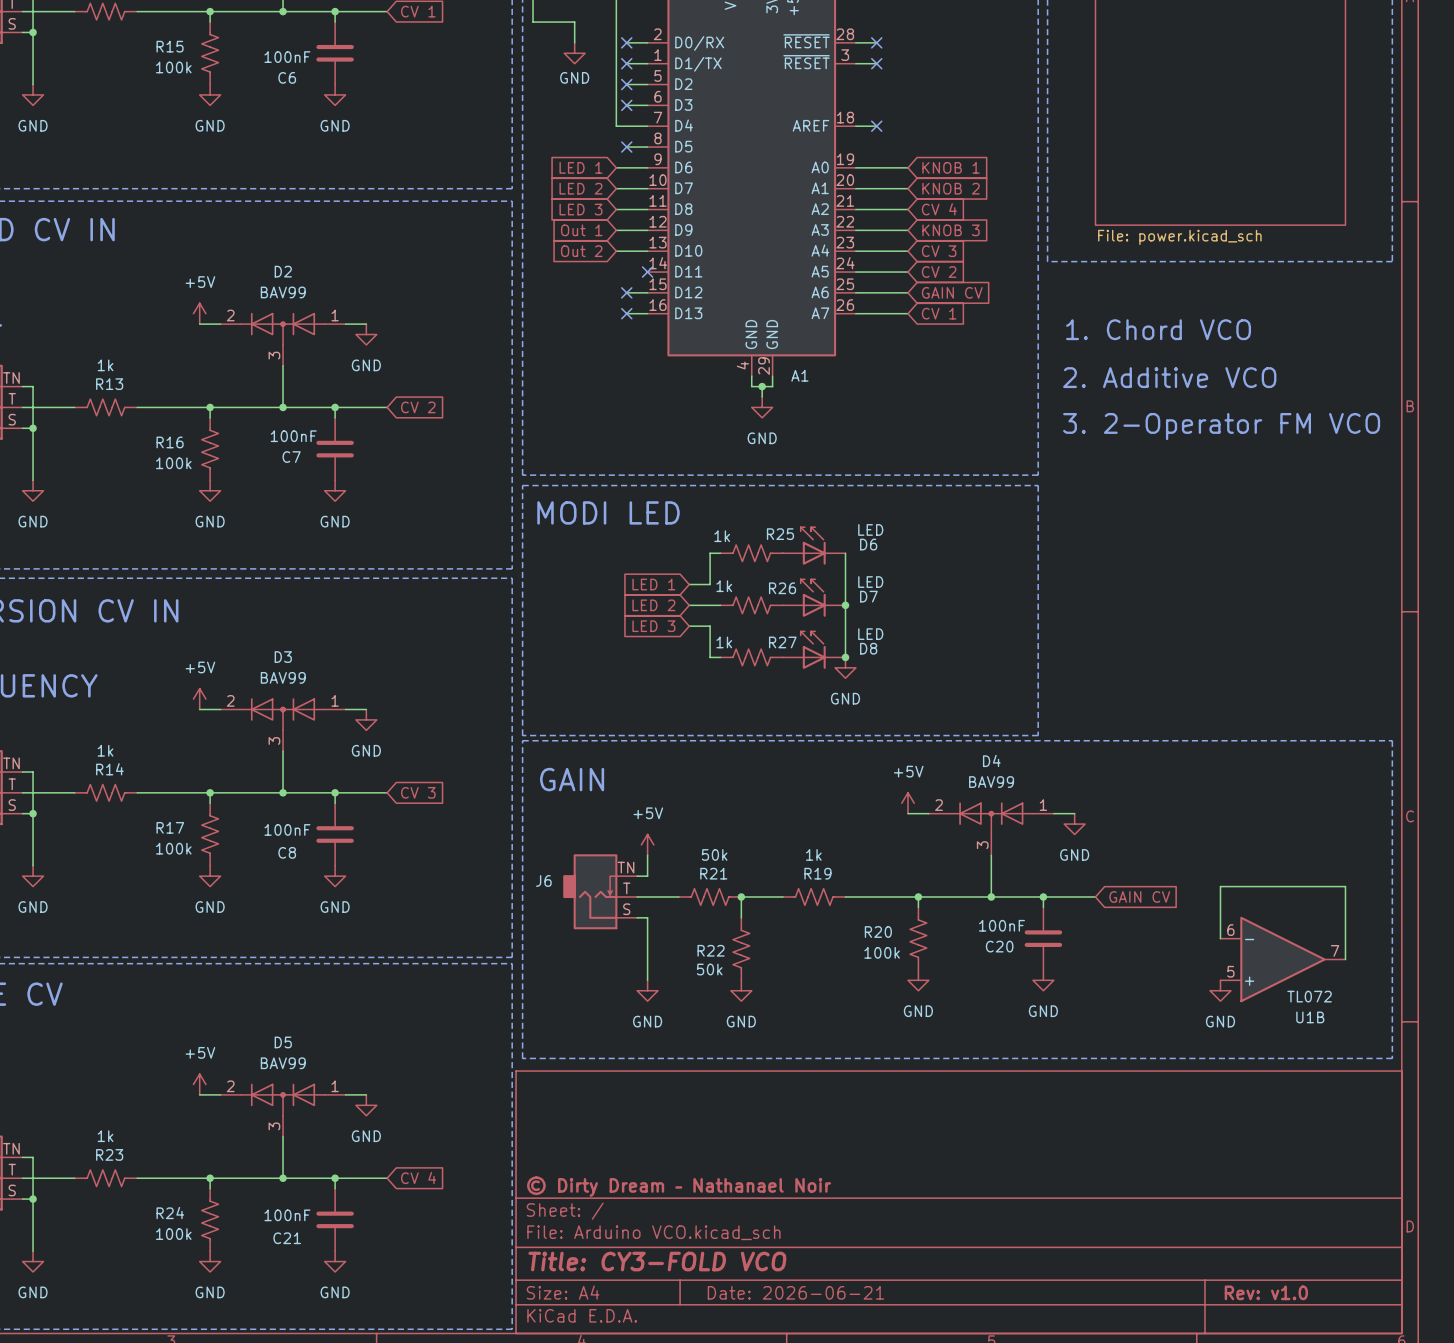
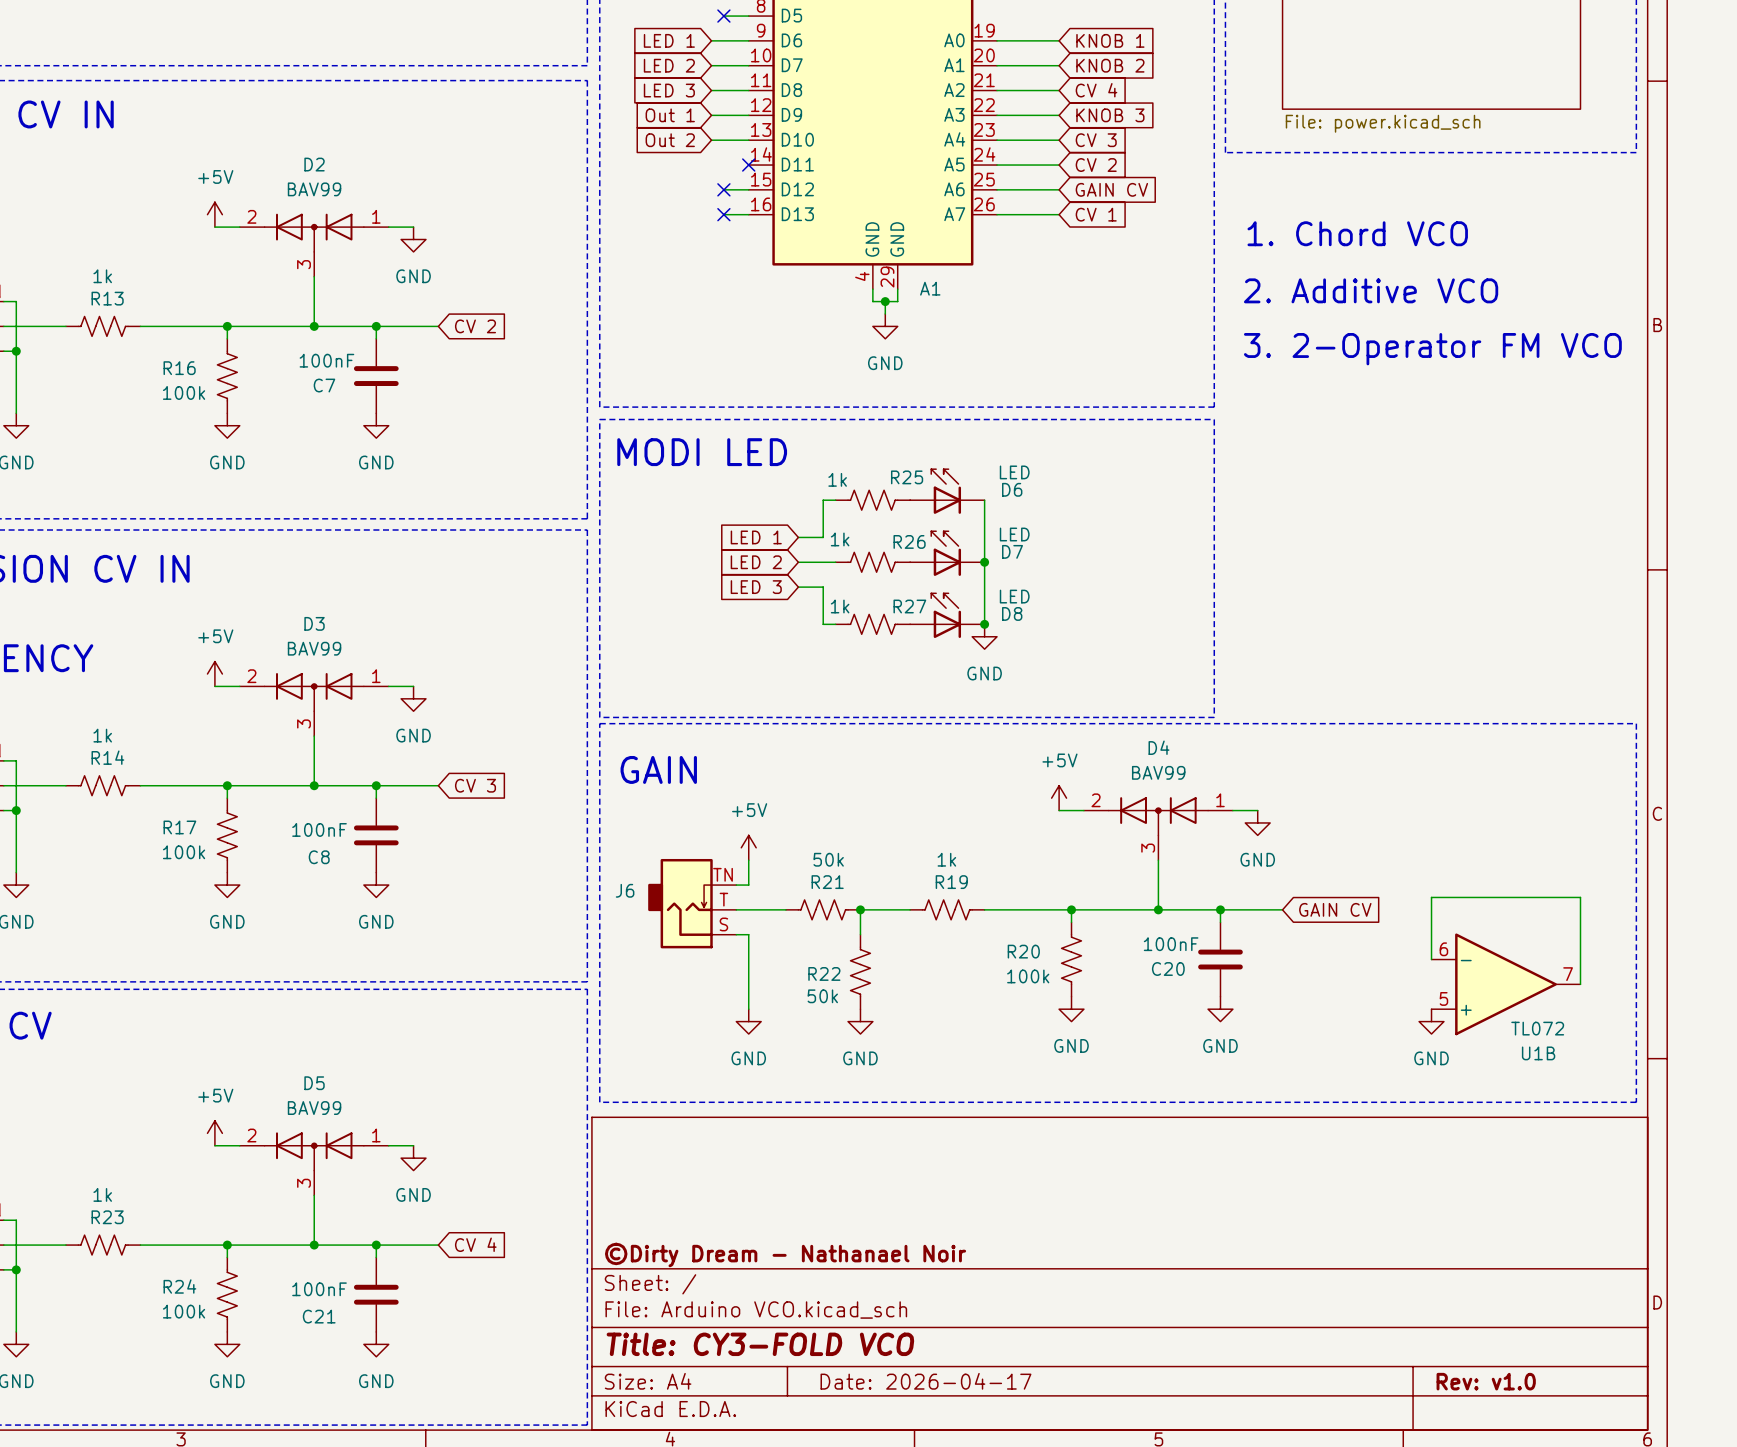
title block: © Dirty Dream – Nathanael Noir (679, 1186) -> ©Dirty Dream - Nathanael Noir (785, 1255)
title block: Date: 2026-06-21 (796, 1292) -> Date: 2026-04-17 (925, 1381)

